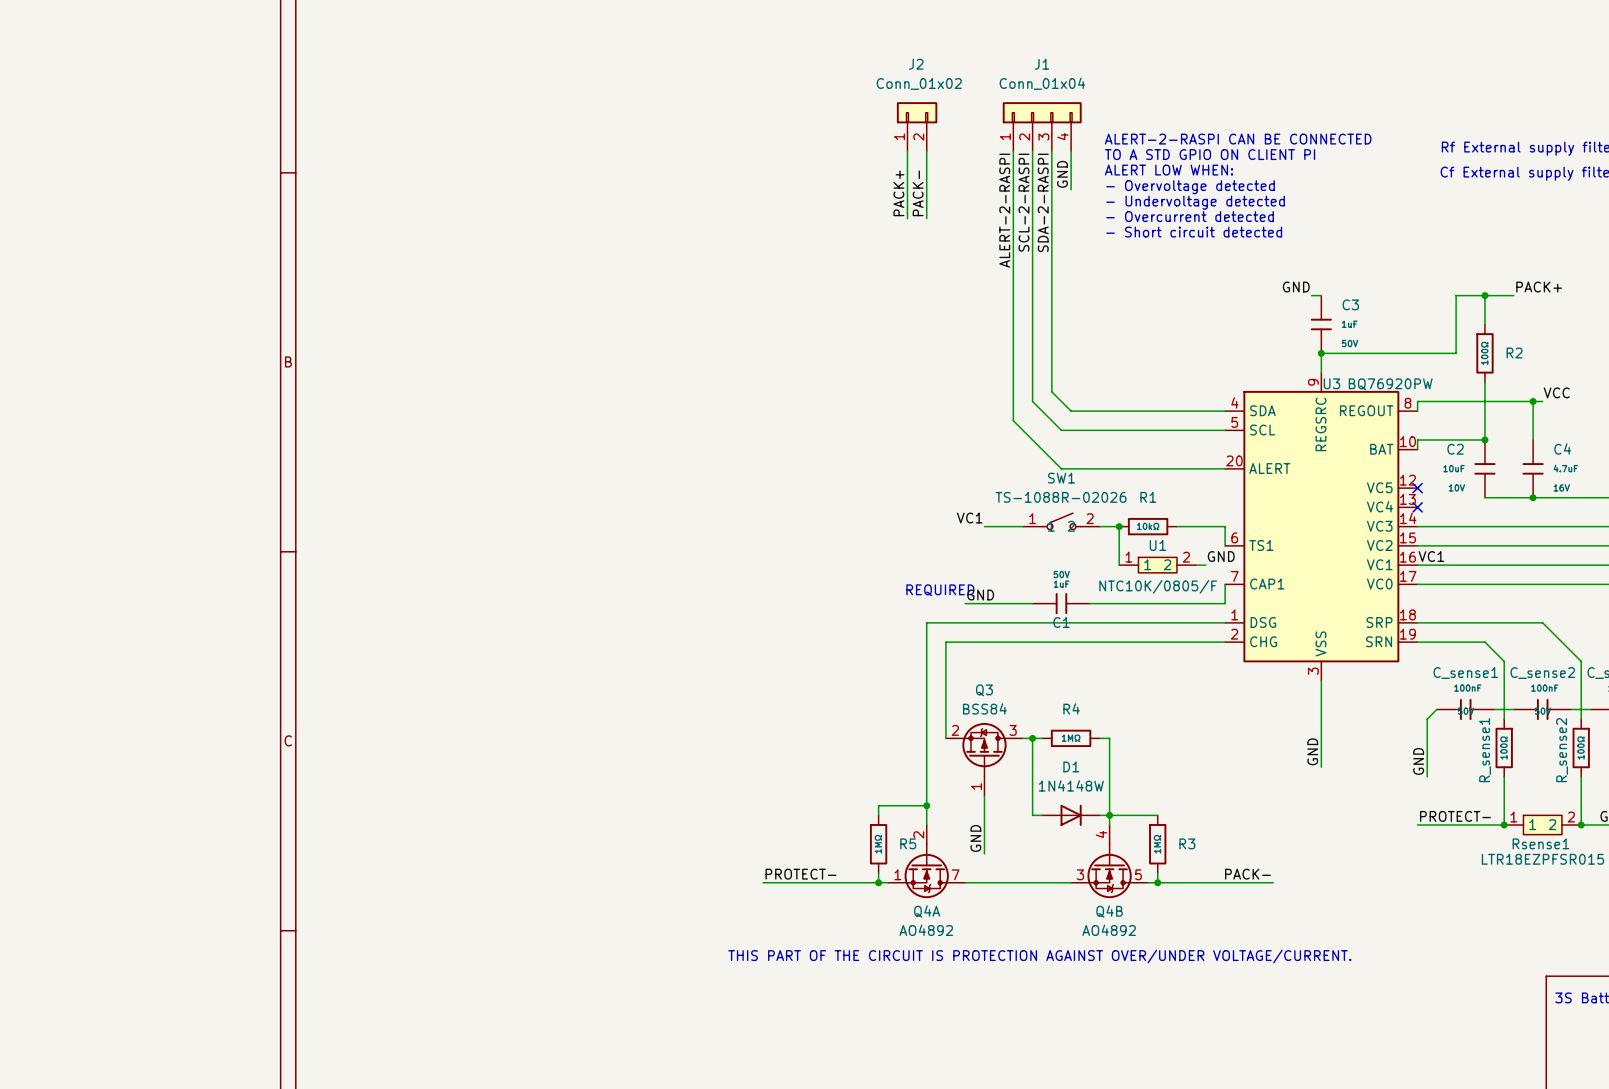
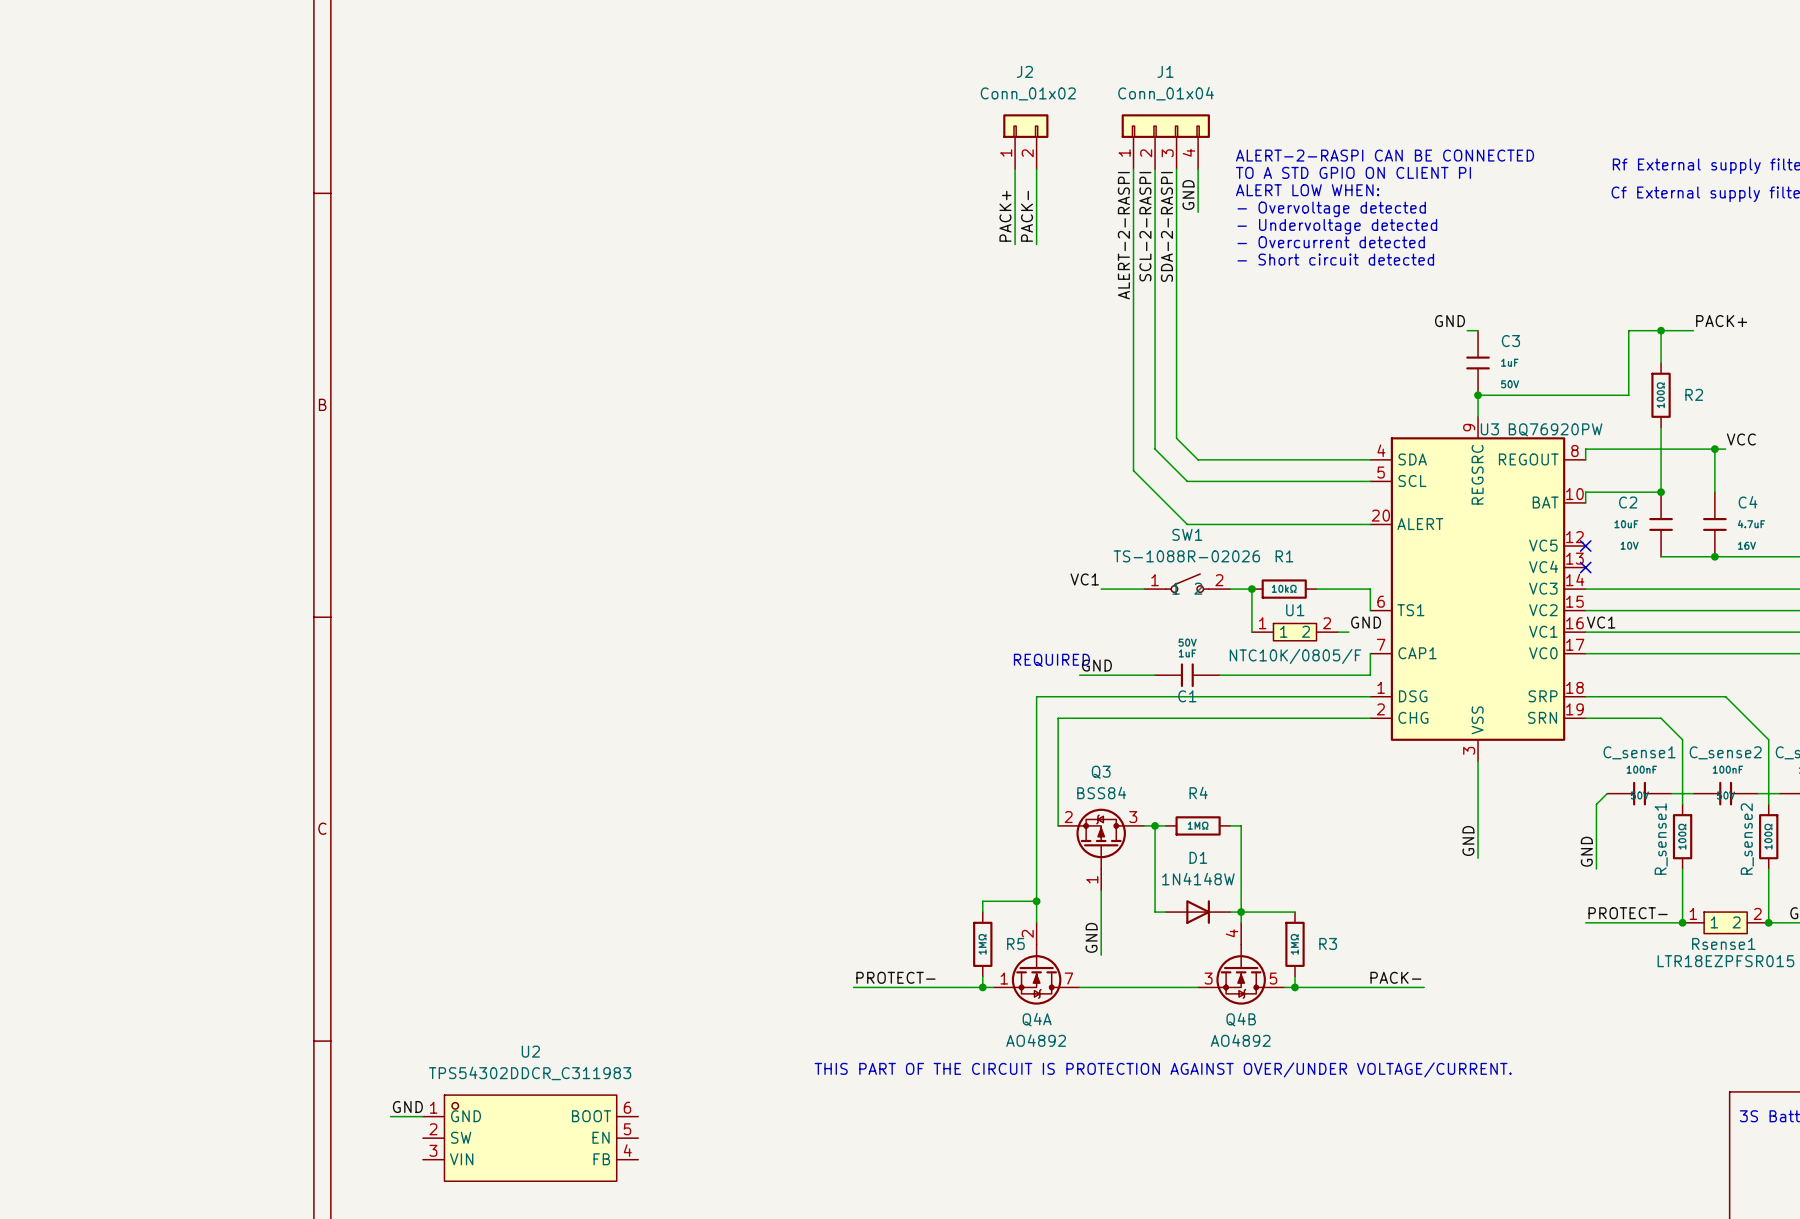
label: none -> GND (407, 1107)
wire: none -> (390, 1116) (422, 1116)
U2: none -> TPS54302DDCR_C311983 (530, 1138)

